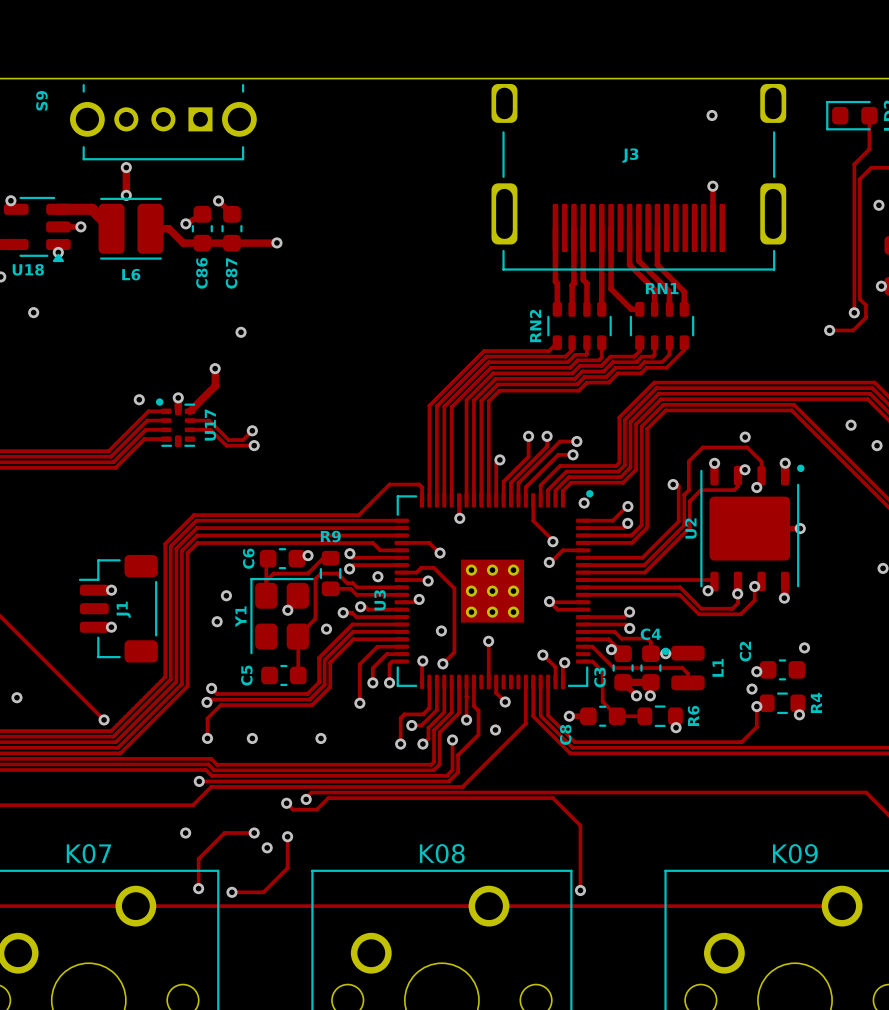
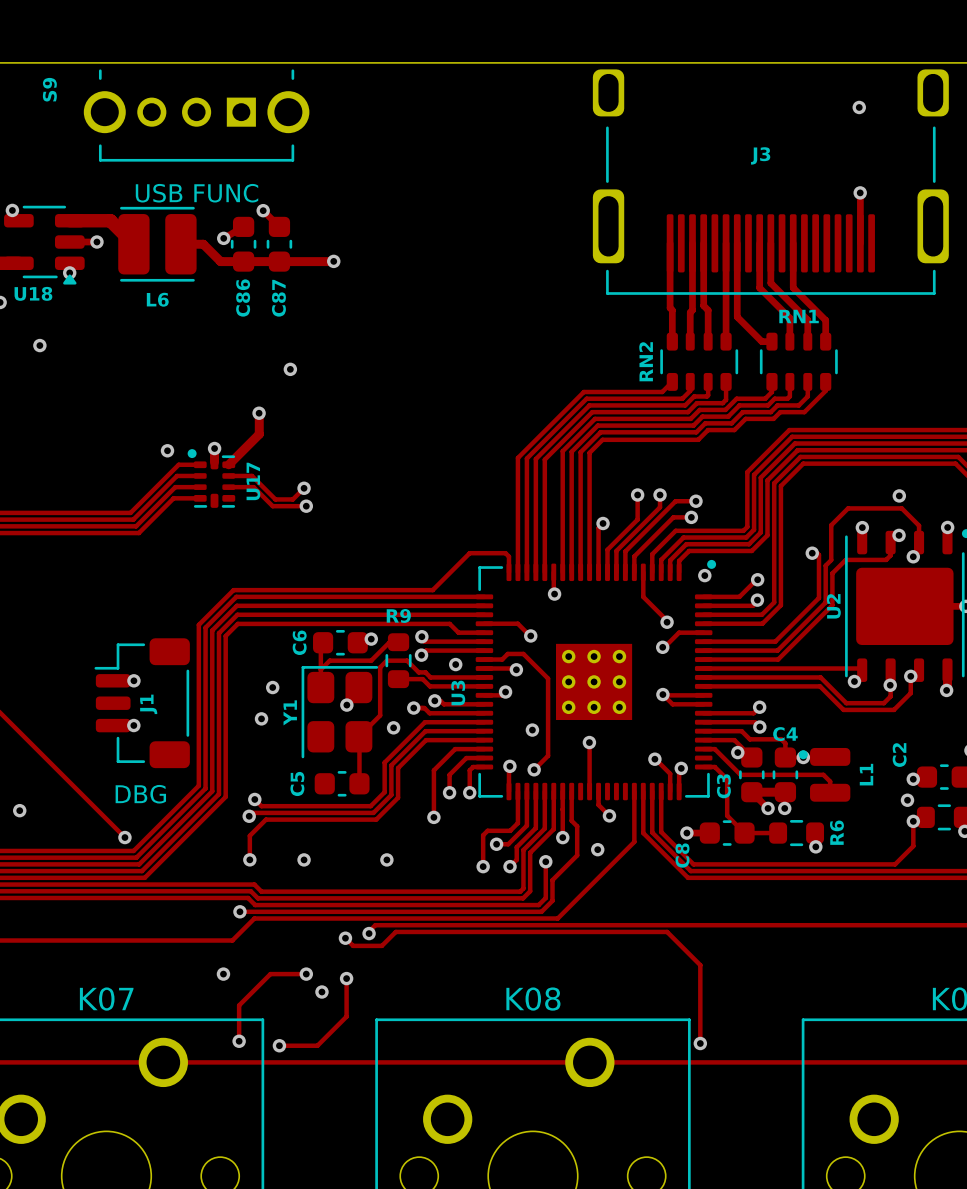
track: (126, 167) (126, 195) -> none
via: (126, 167) -> none
text: none -> USB FUNC (197, 193)
via: (126, 195) -> none
text: none -> DBG (140, 794)

